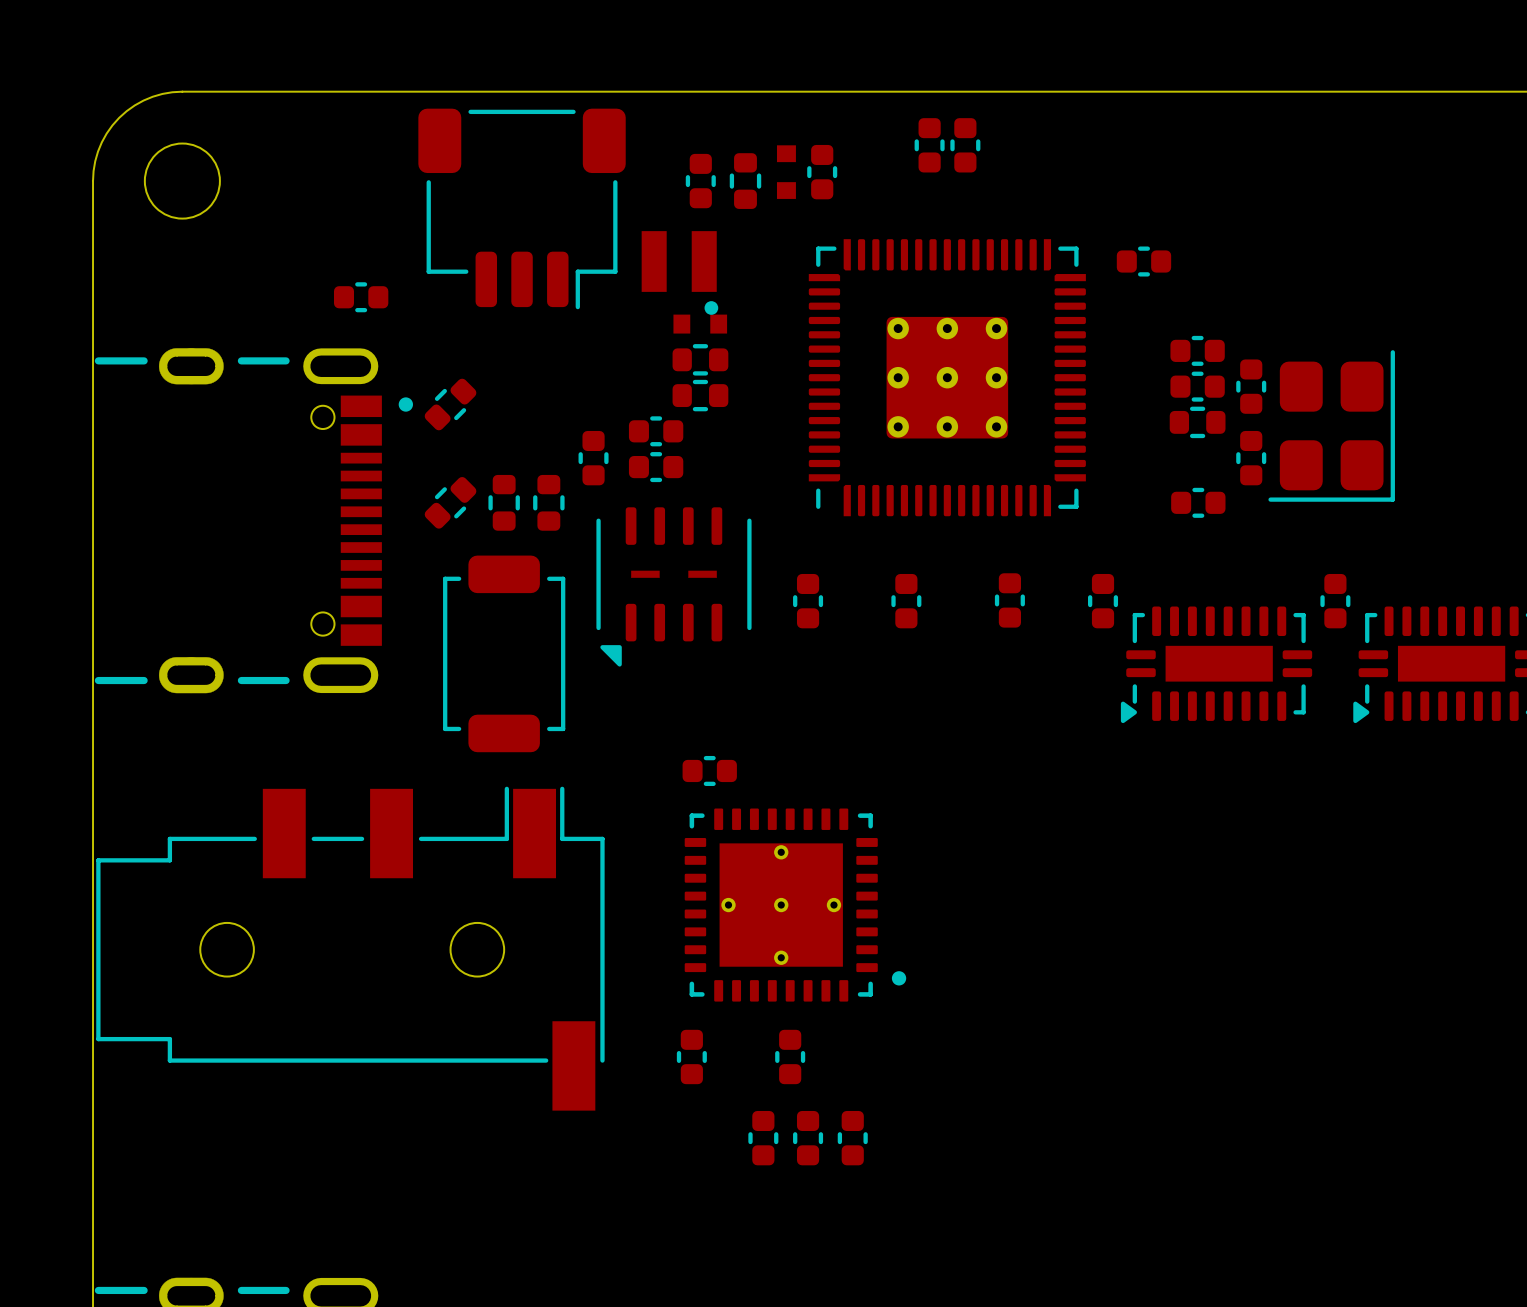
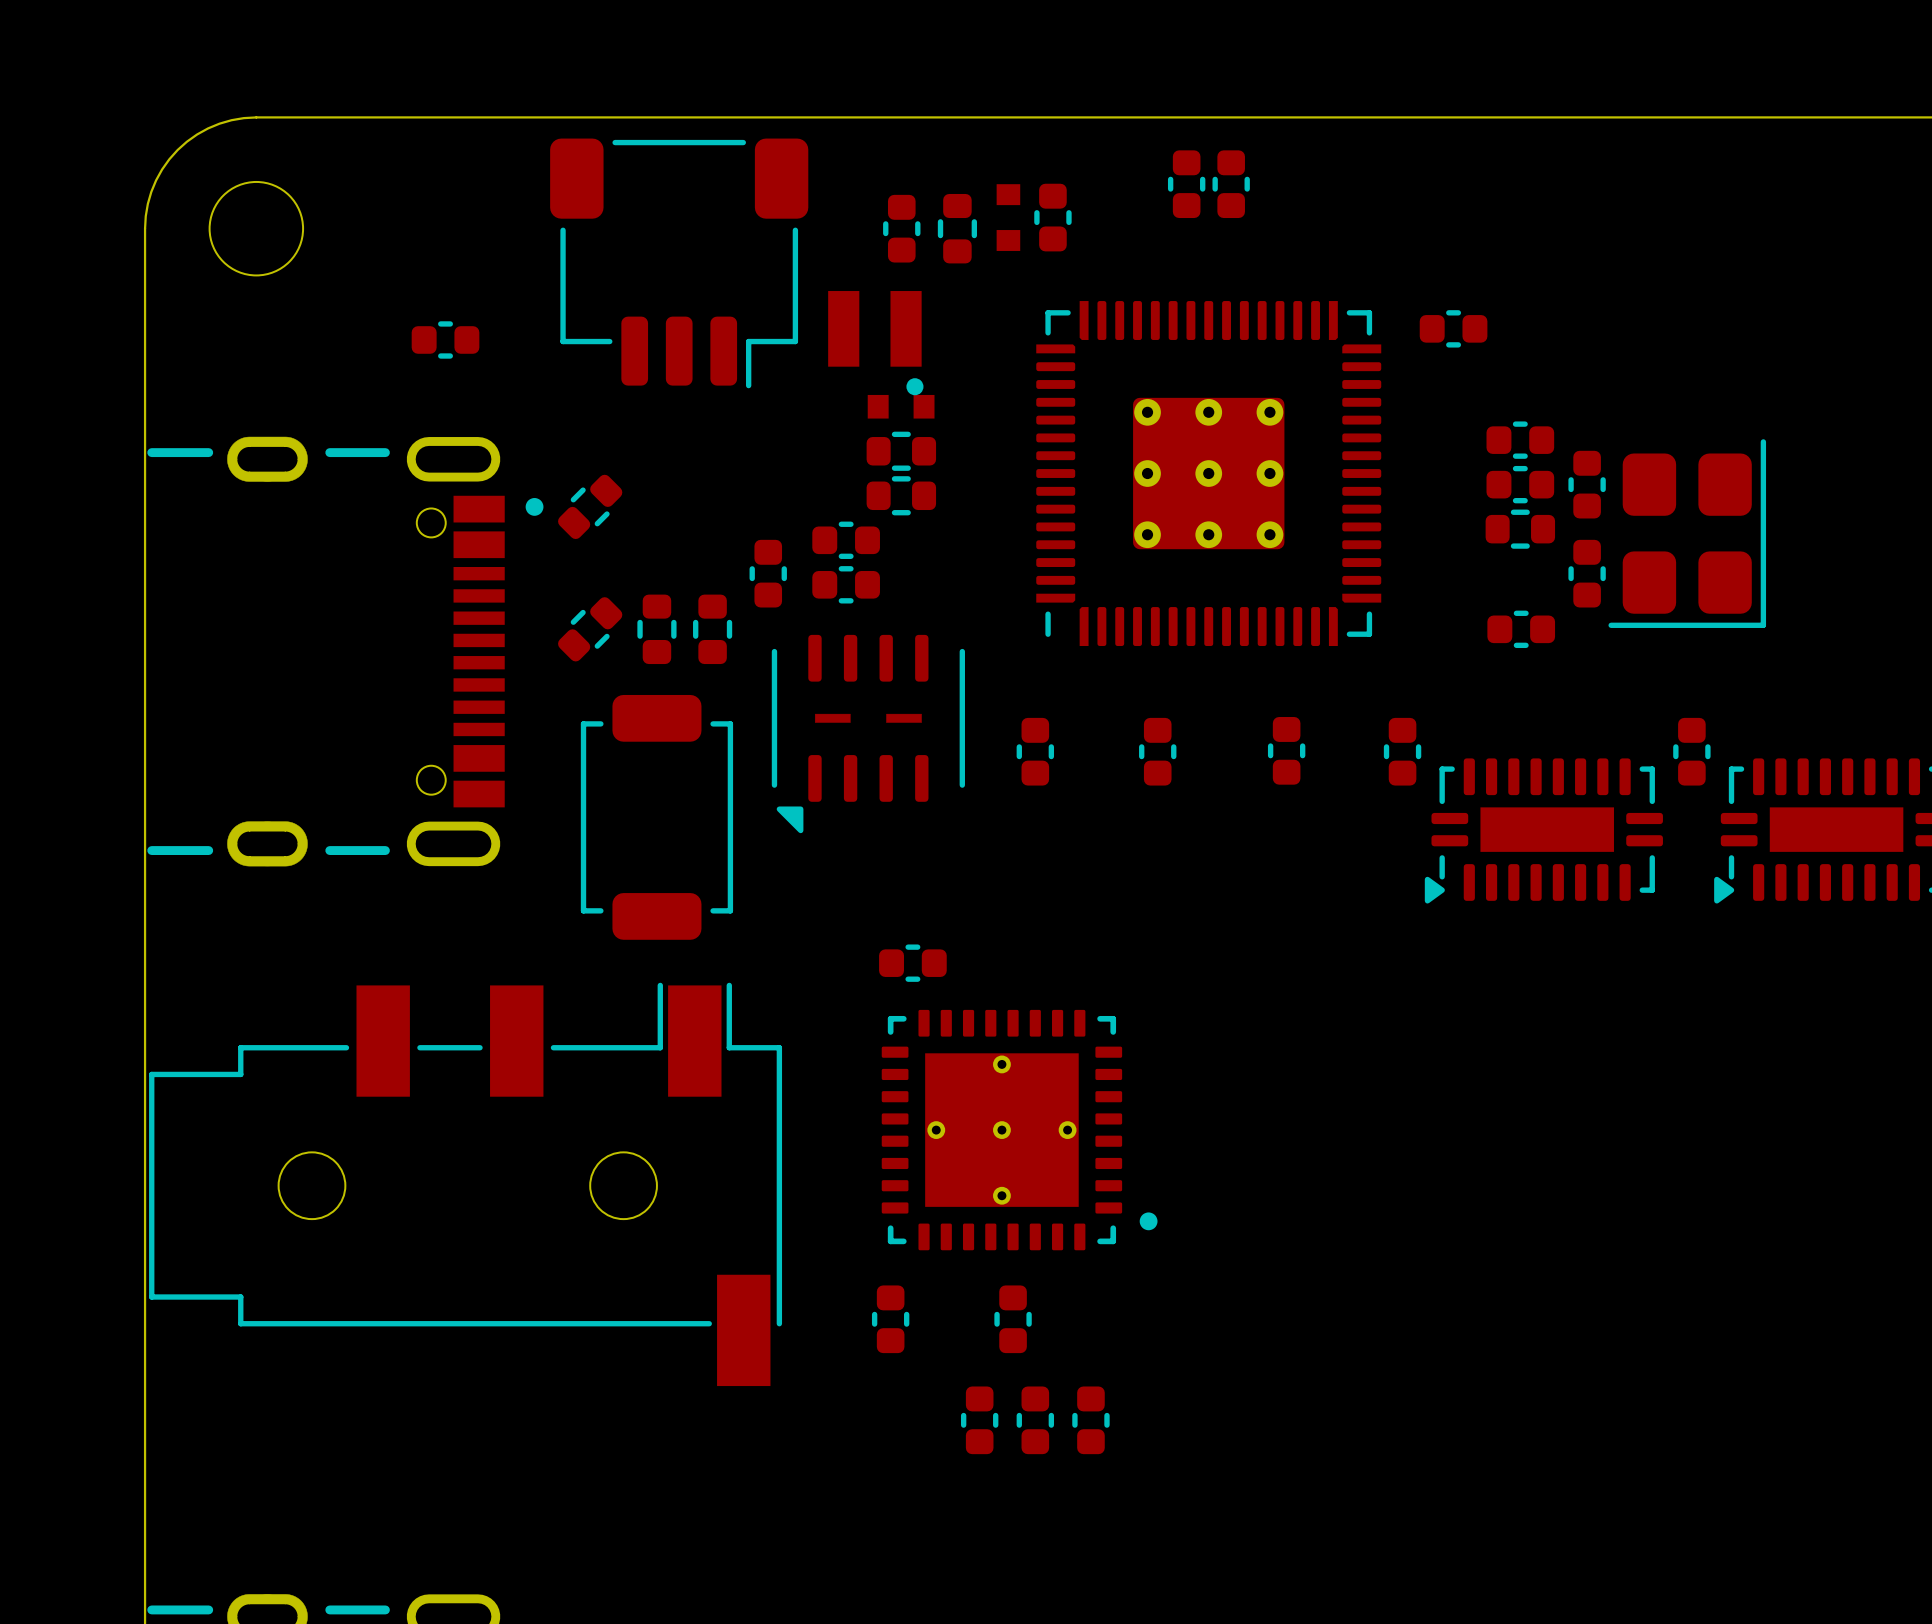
part position: (361, 297) -> (445, 339)

